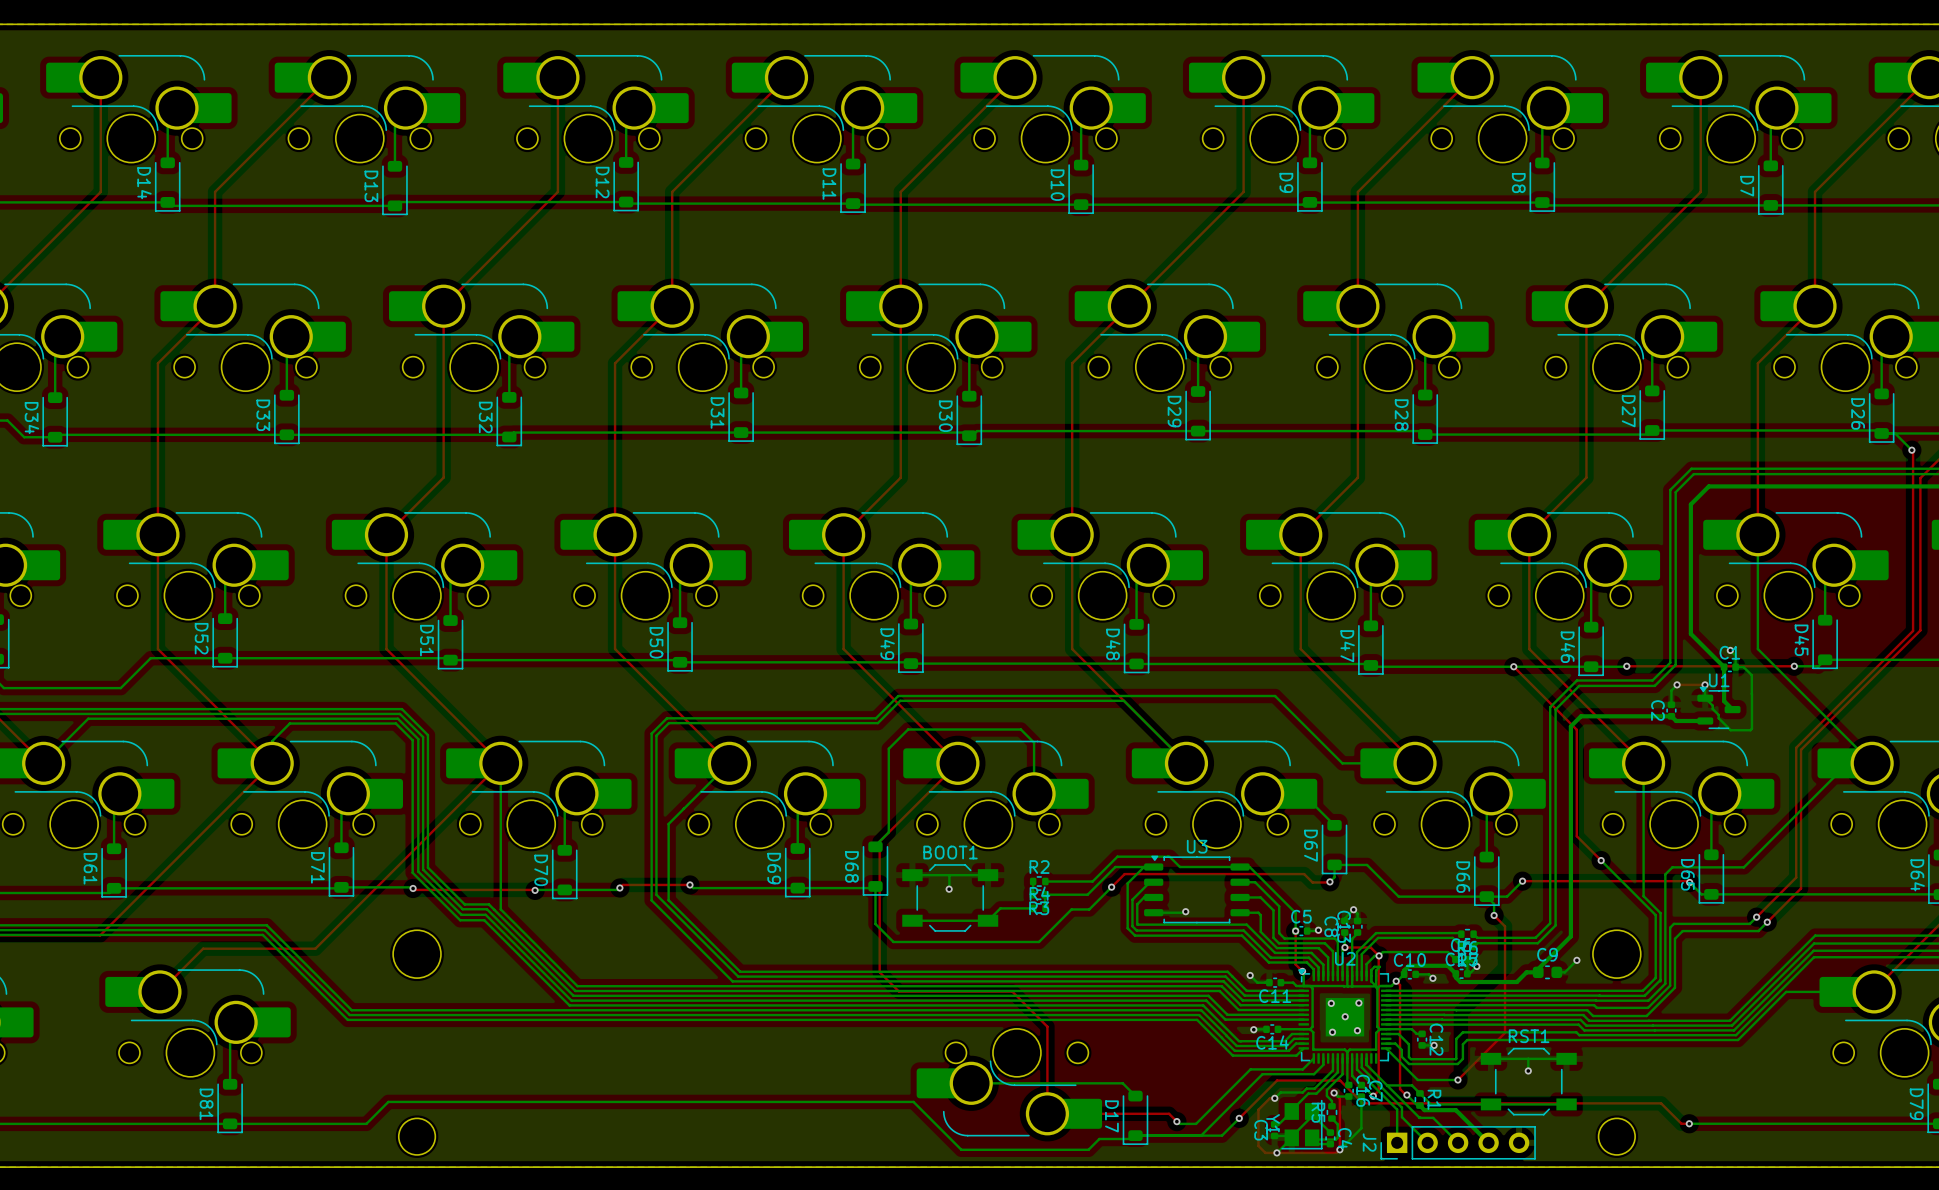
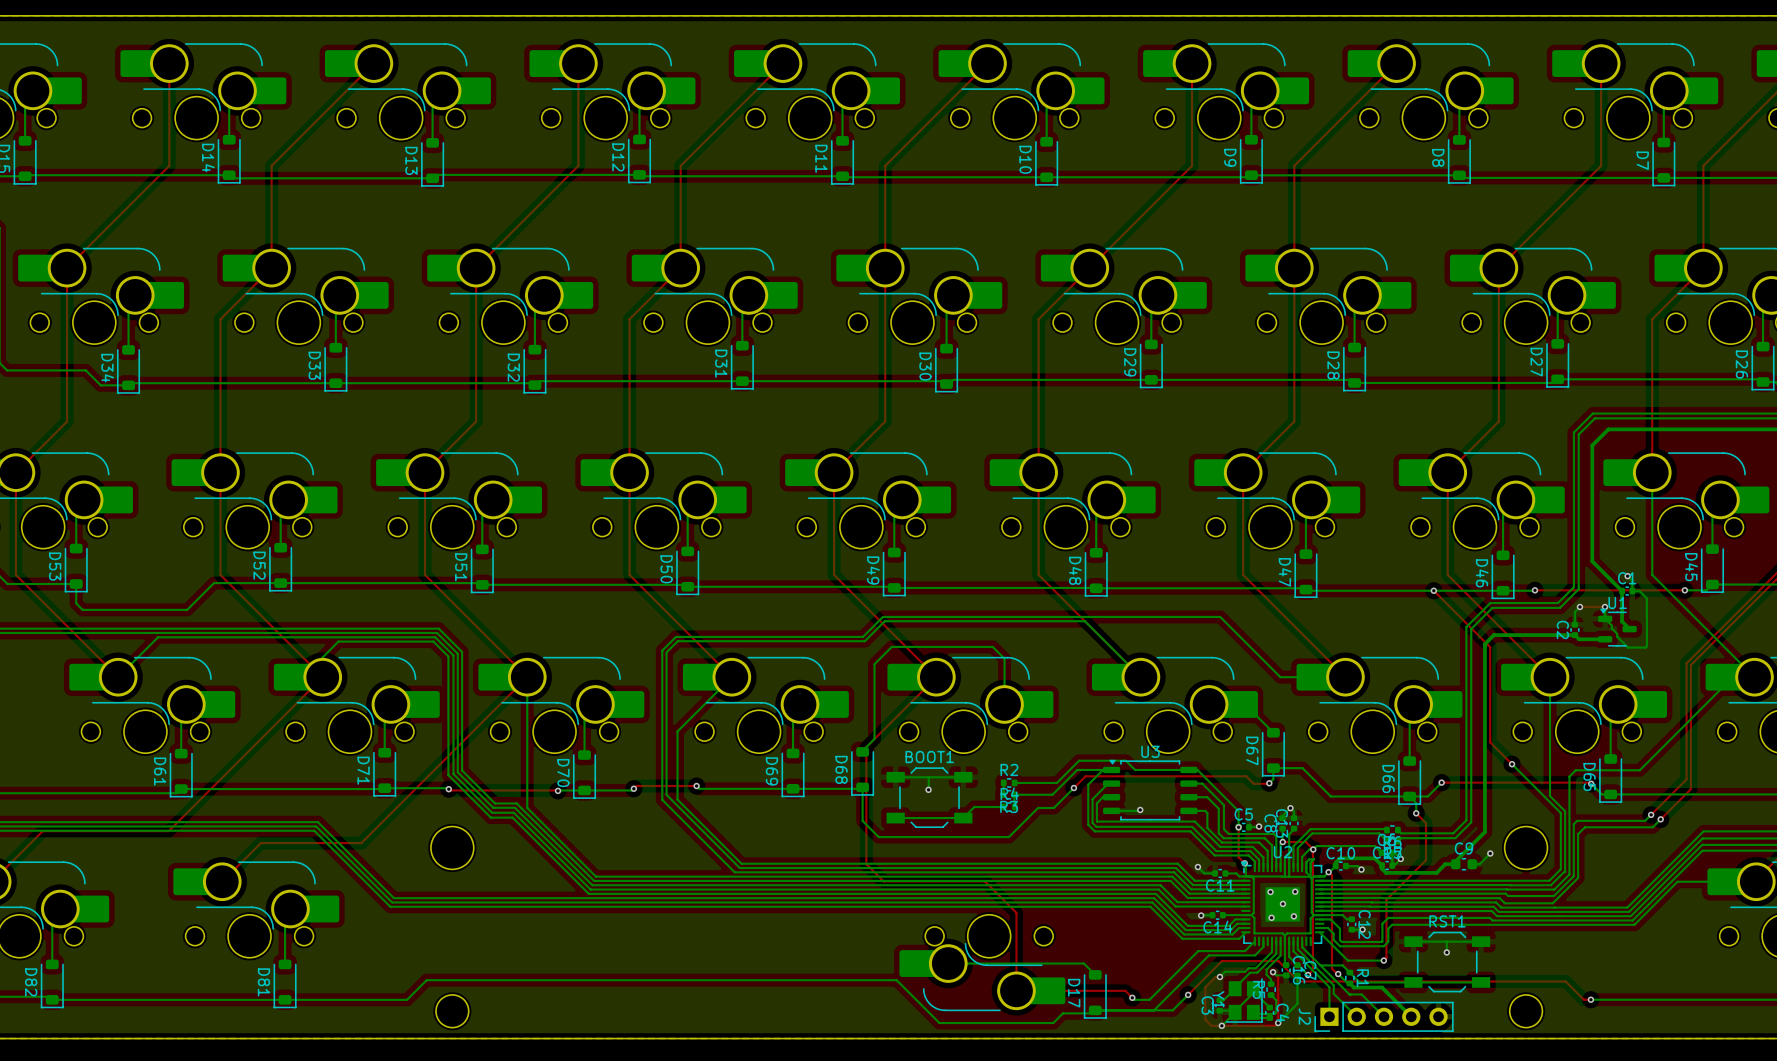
top track: (1505, 967) (1505, 1032) (1460, 1077) -> (1425, 860) (1386, 899) (1386, 957)

